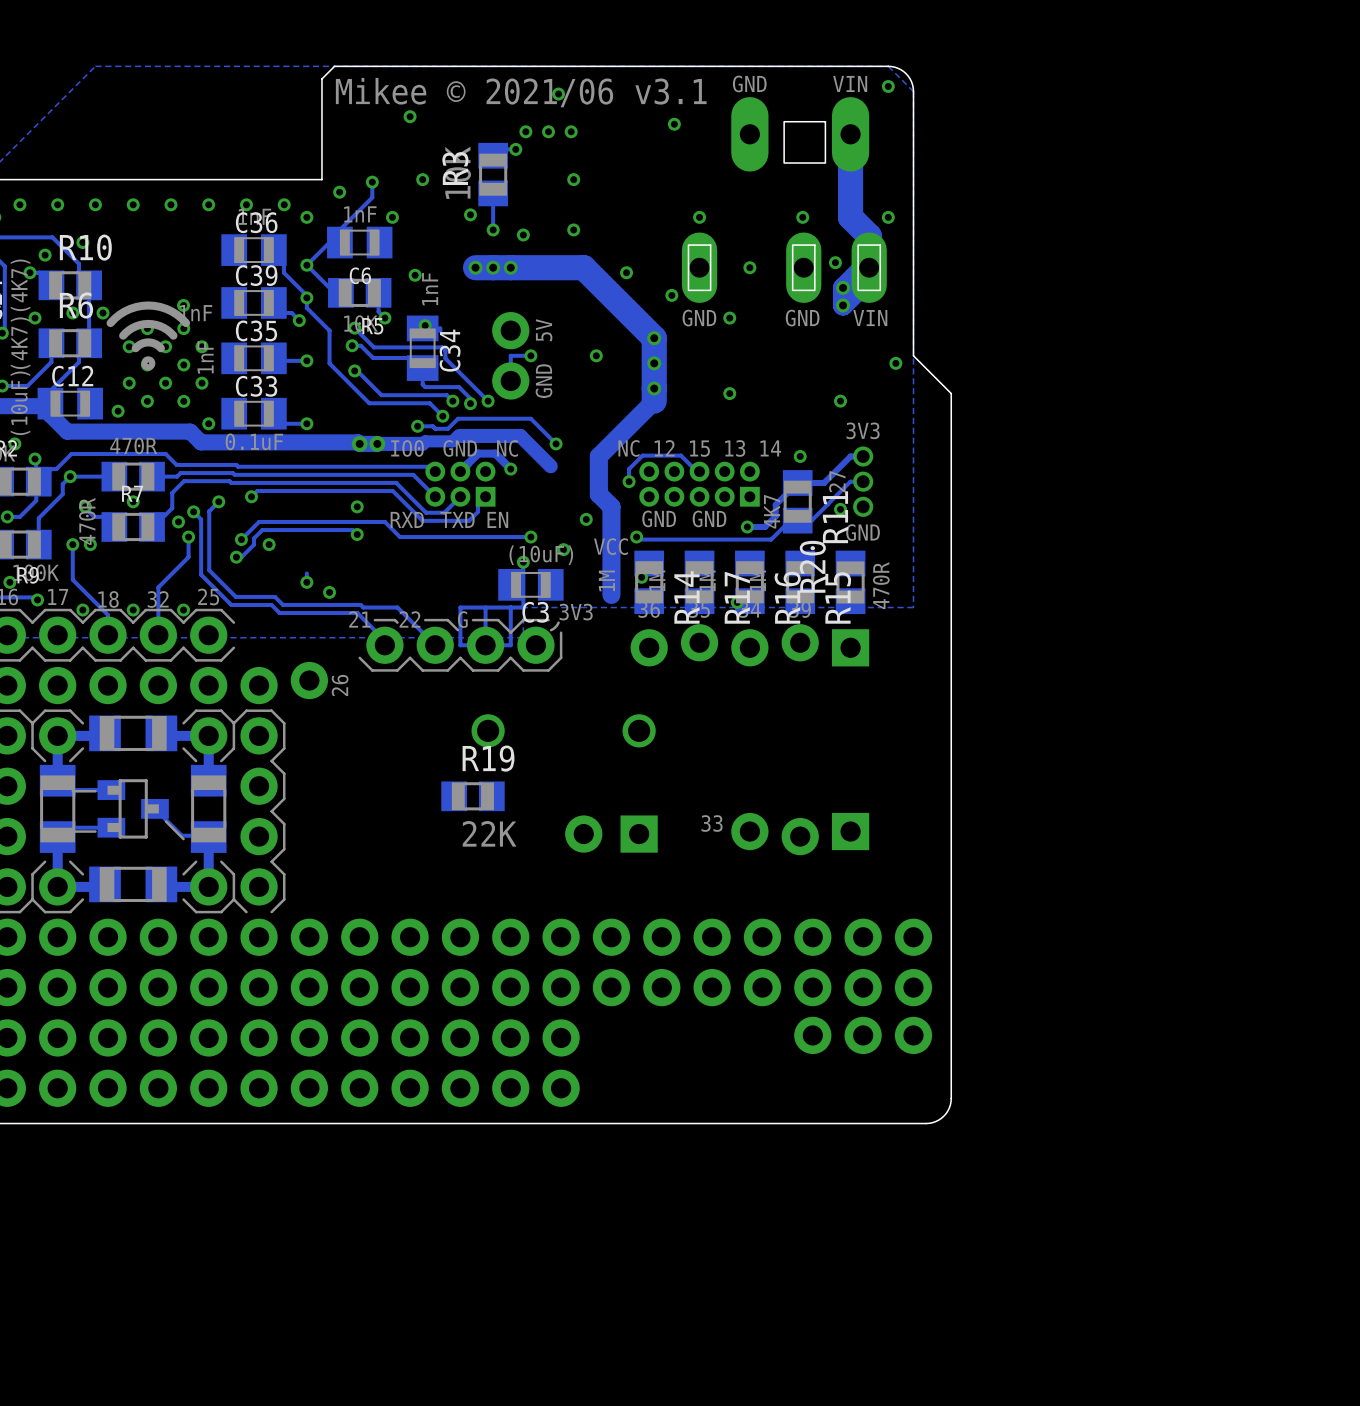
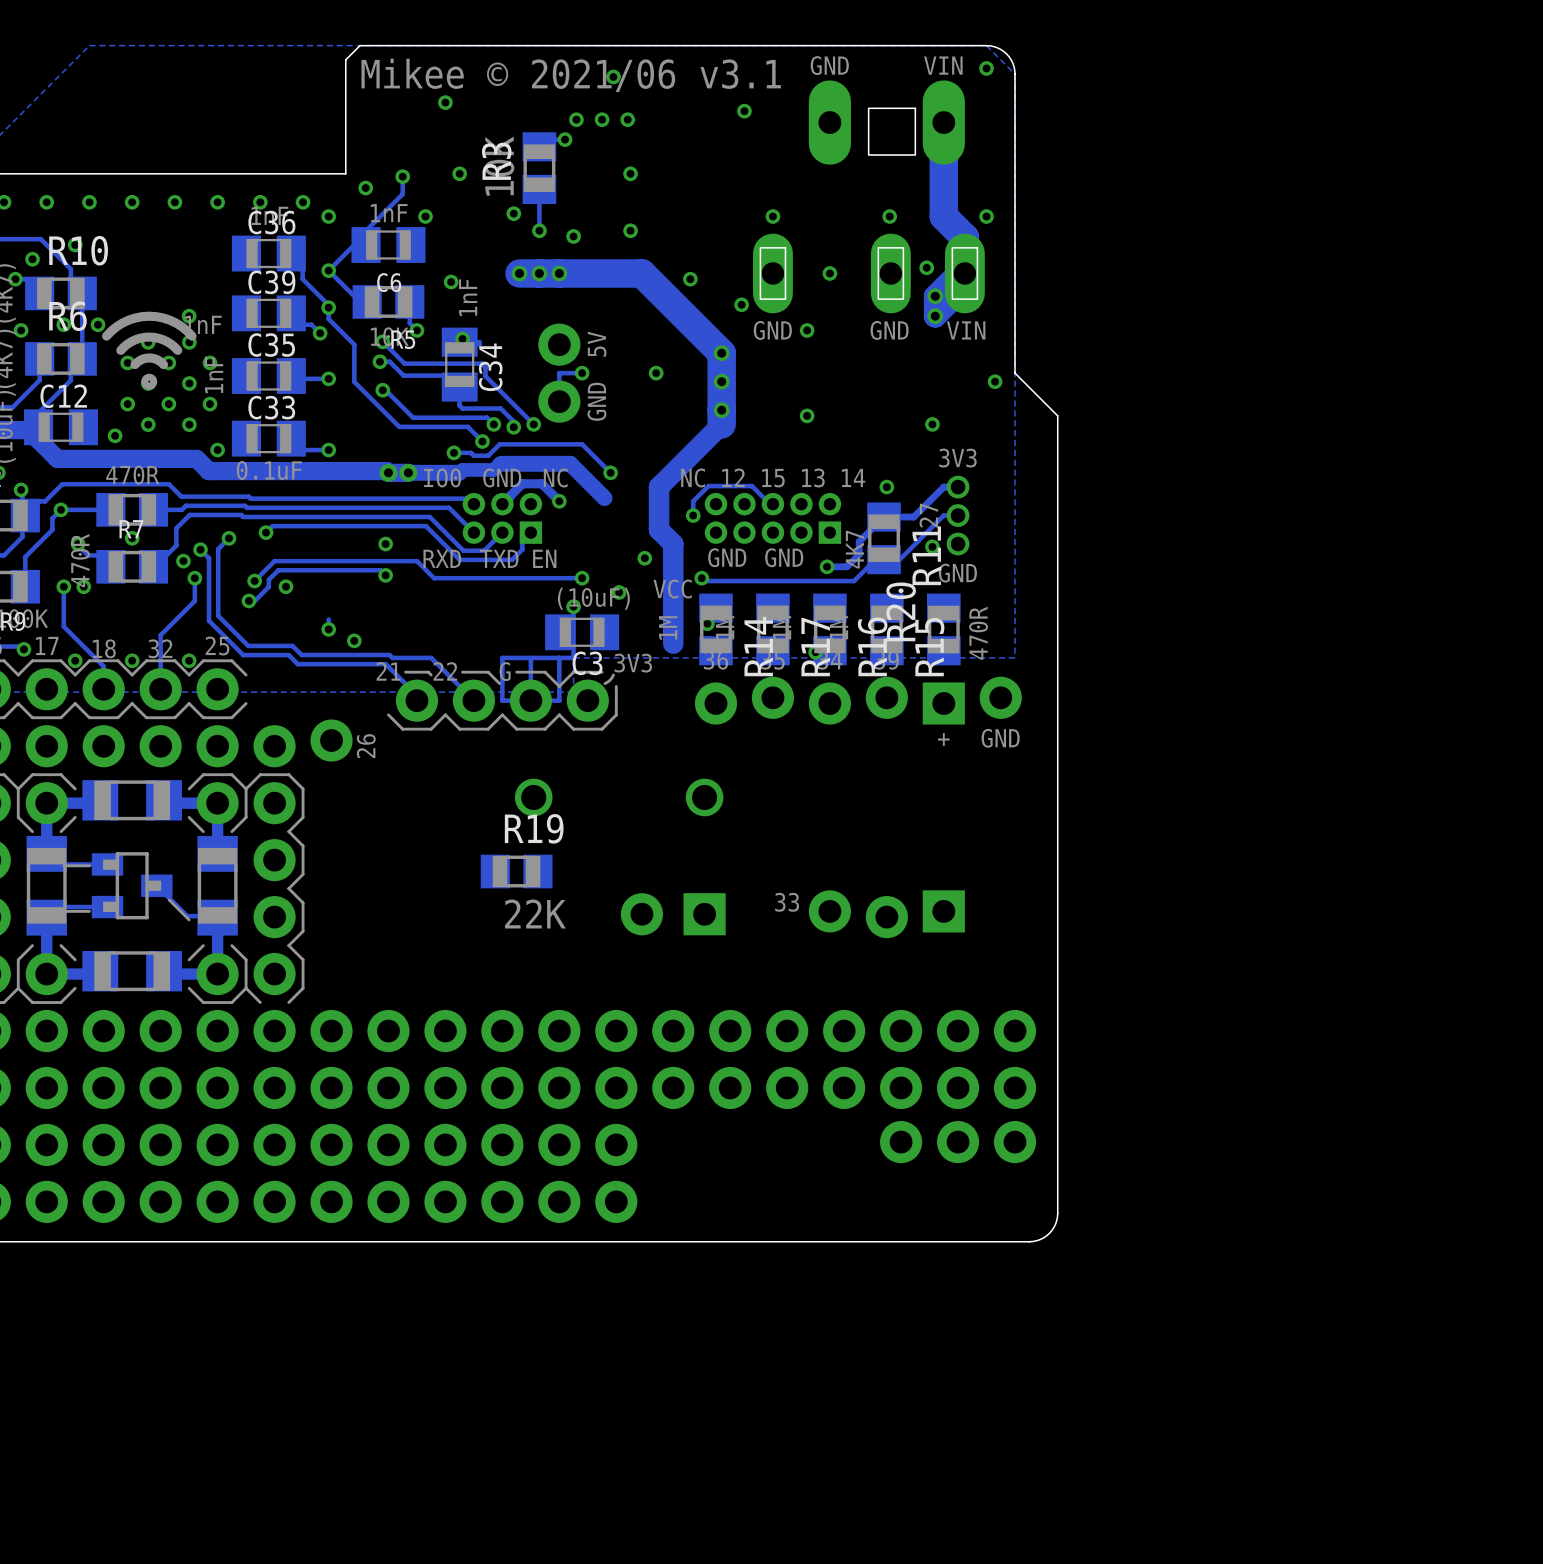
part: none -> (1000, 697)
text: none -> GND (1000, 738)
text: none -> + (943, 739)

